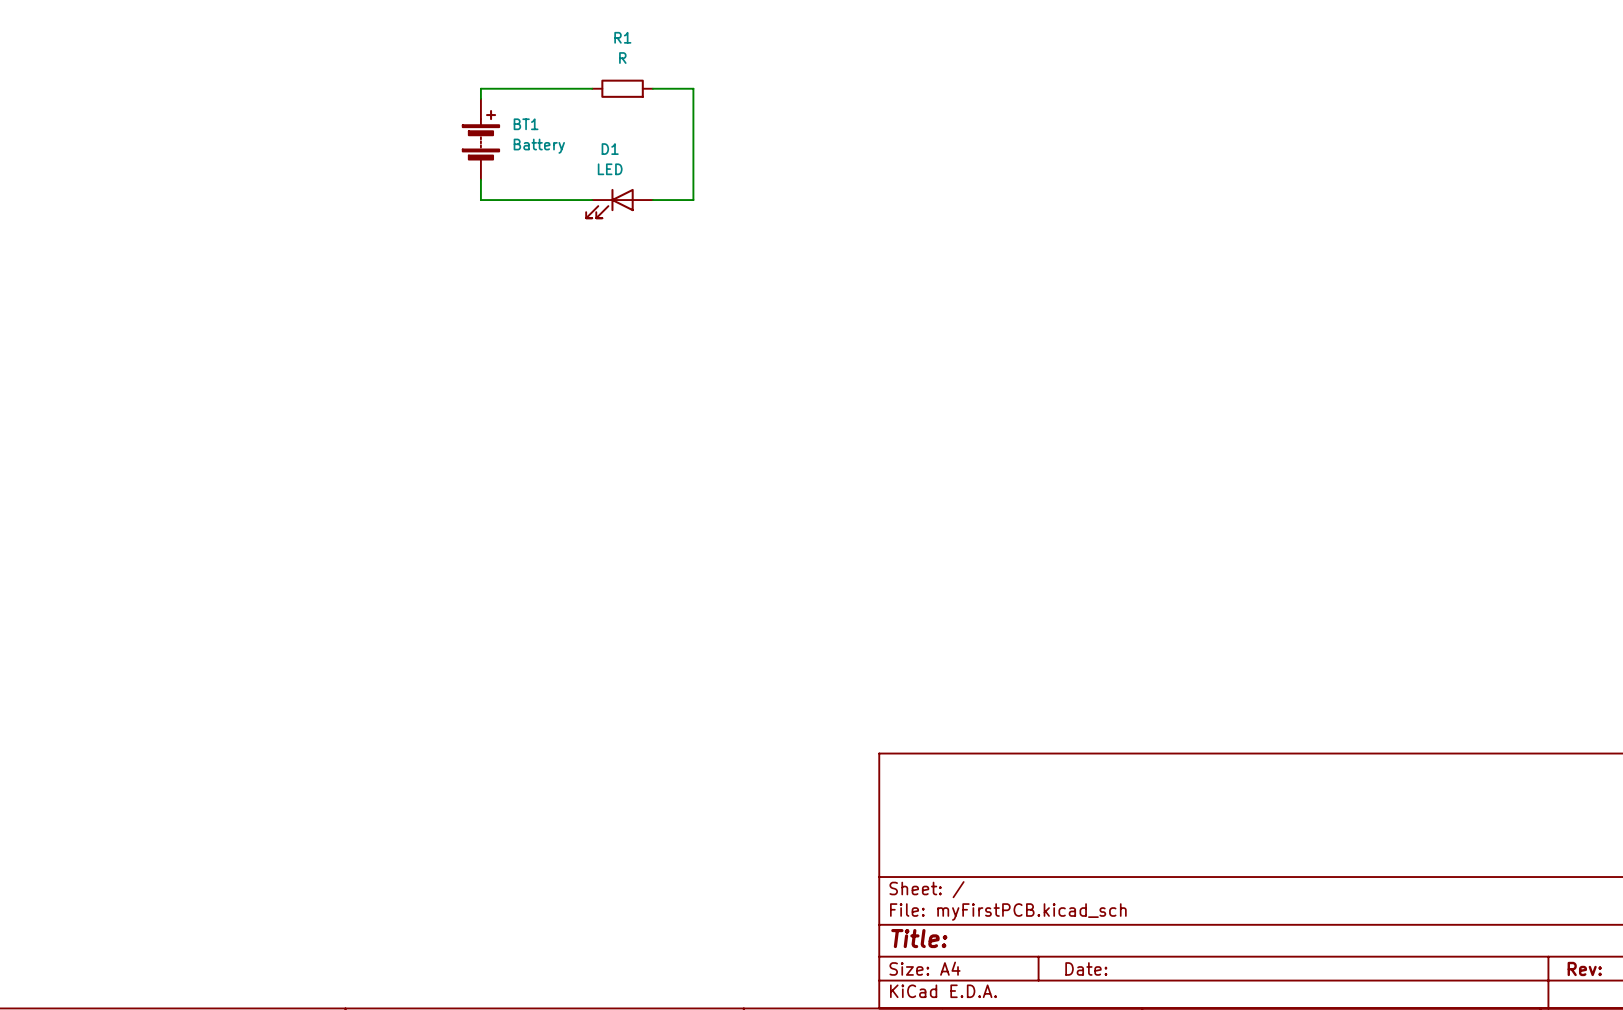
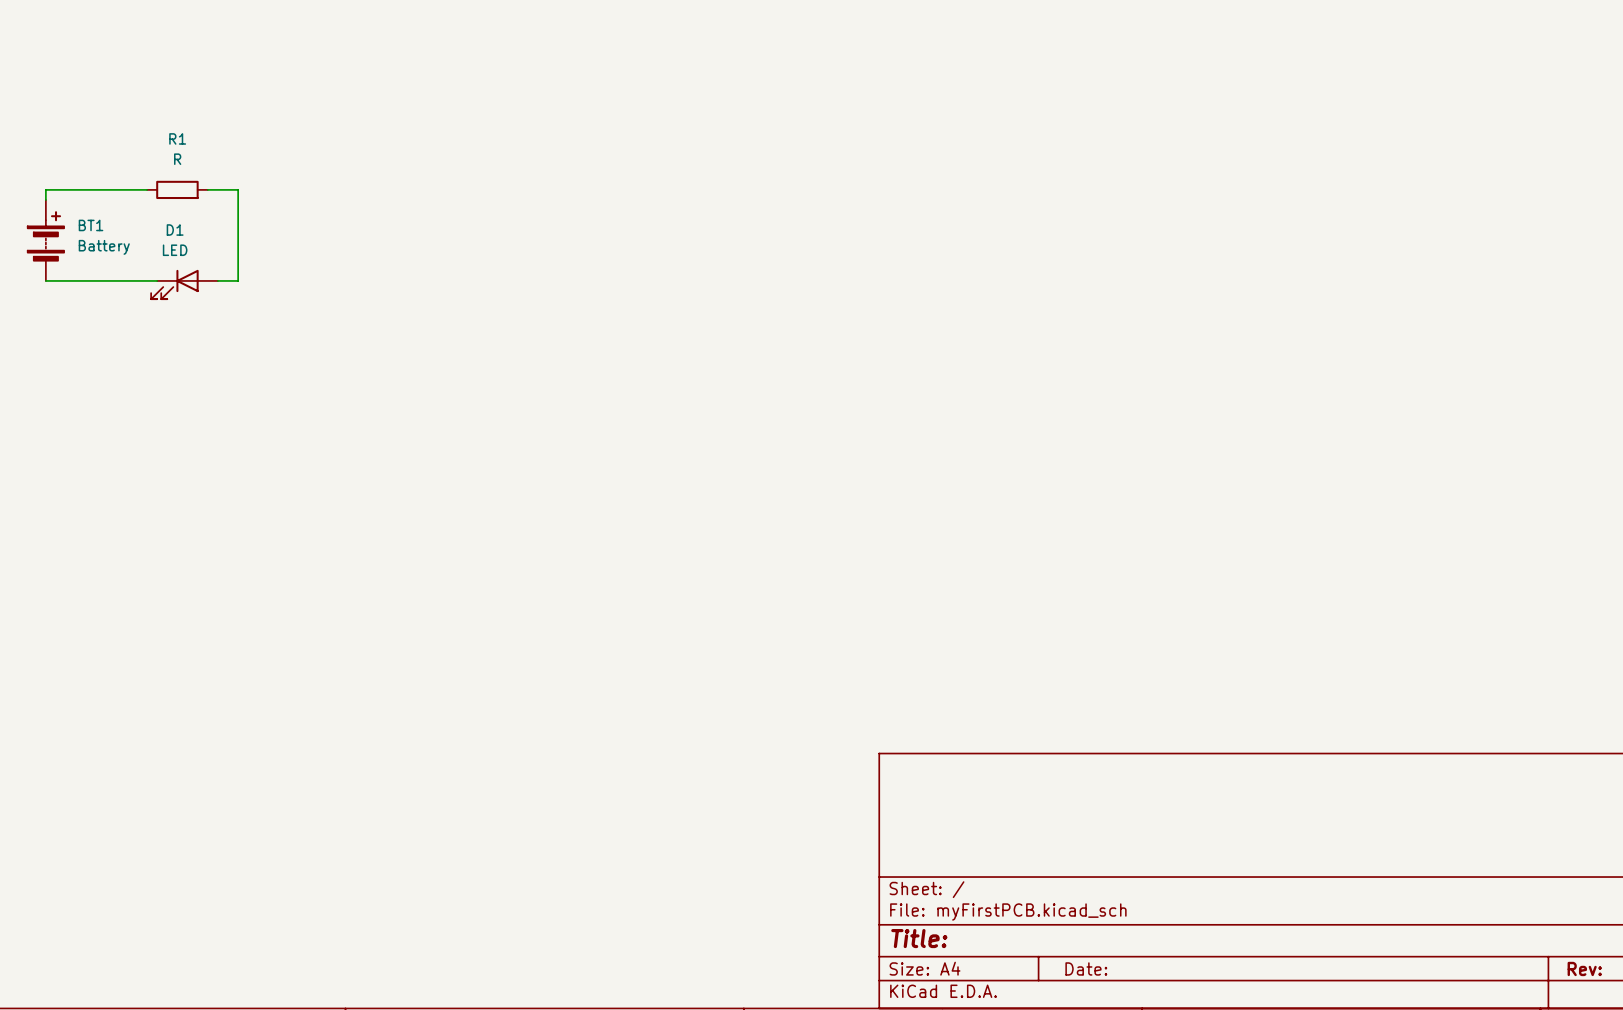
wire: (592, 88) (480, 88) (480, 98) -> none
R1 position: (622, 88) -> (177, 189)
wire: (652, 88) (693, 88) (693, 200) (652, 200) -> none
BT1 position: (480, 139) -> (45, 240)
wire: (480, 179) (480, 200) (592, 200) -> none
wire: none -> (147, 189) (45, 189) (45, 200)
wire: none -> (207, 189) (238, 189) (238, 280) (217, 280)
D1 position: (619, 203) -> (184, 284)
wire: none -> (45, 280) (157, 280)

